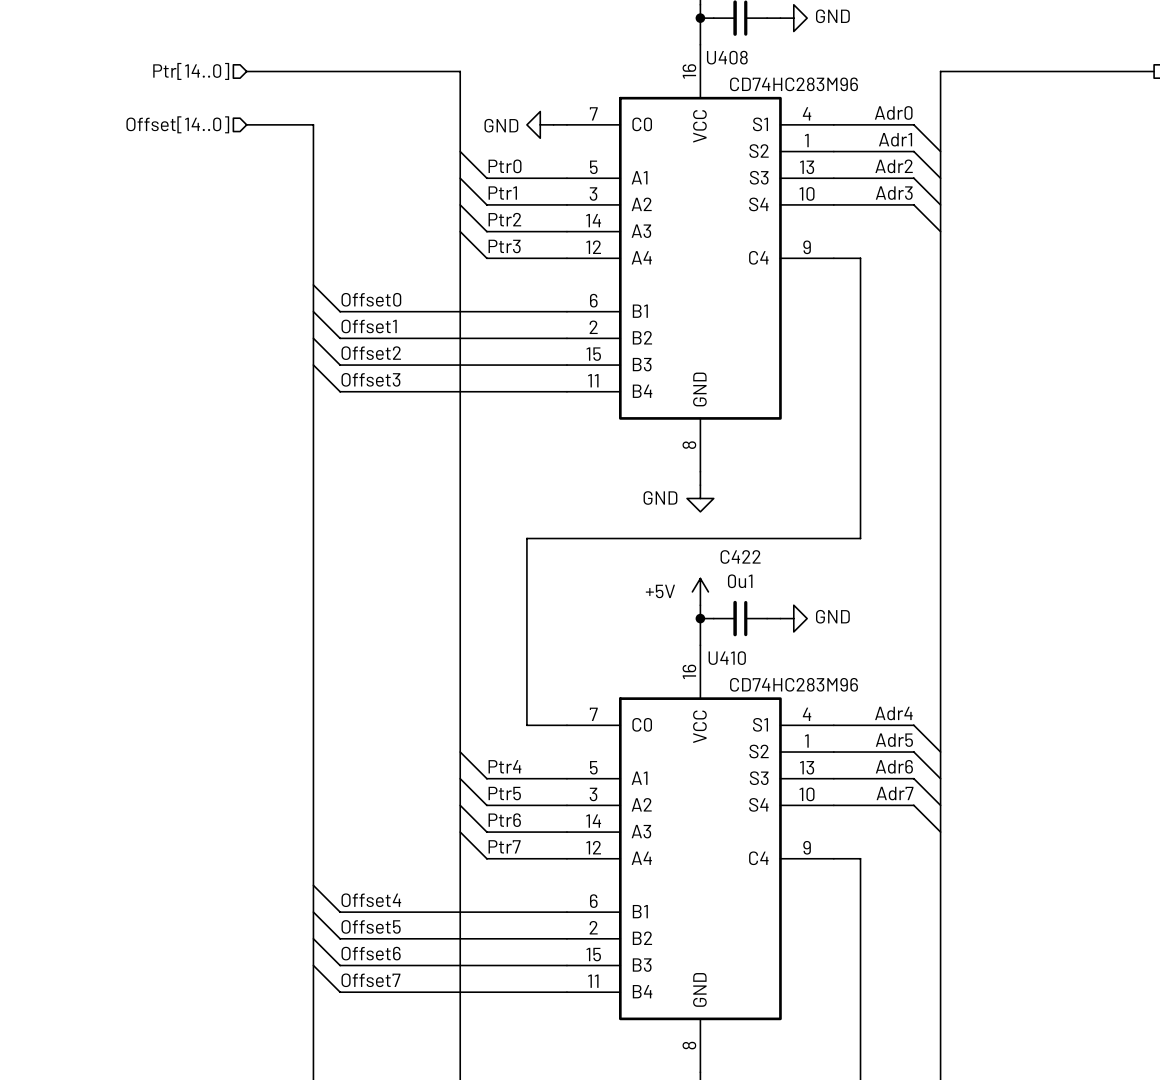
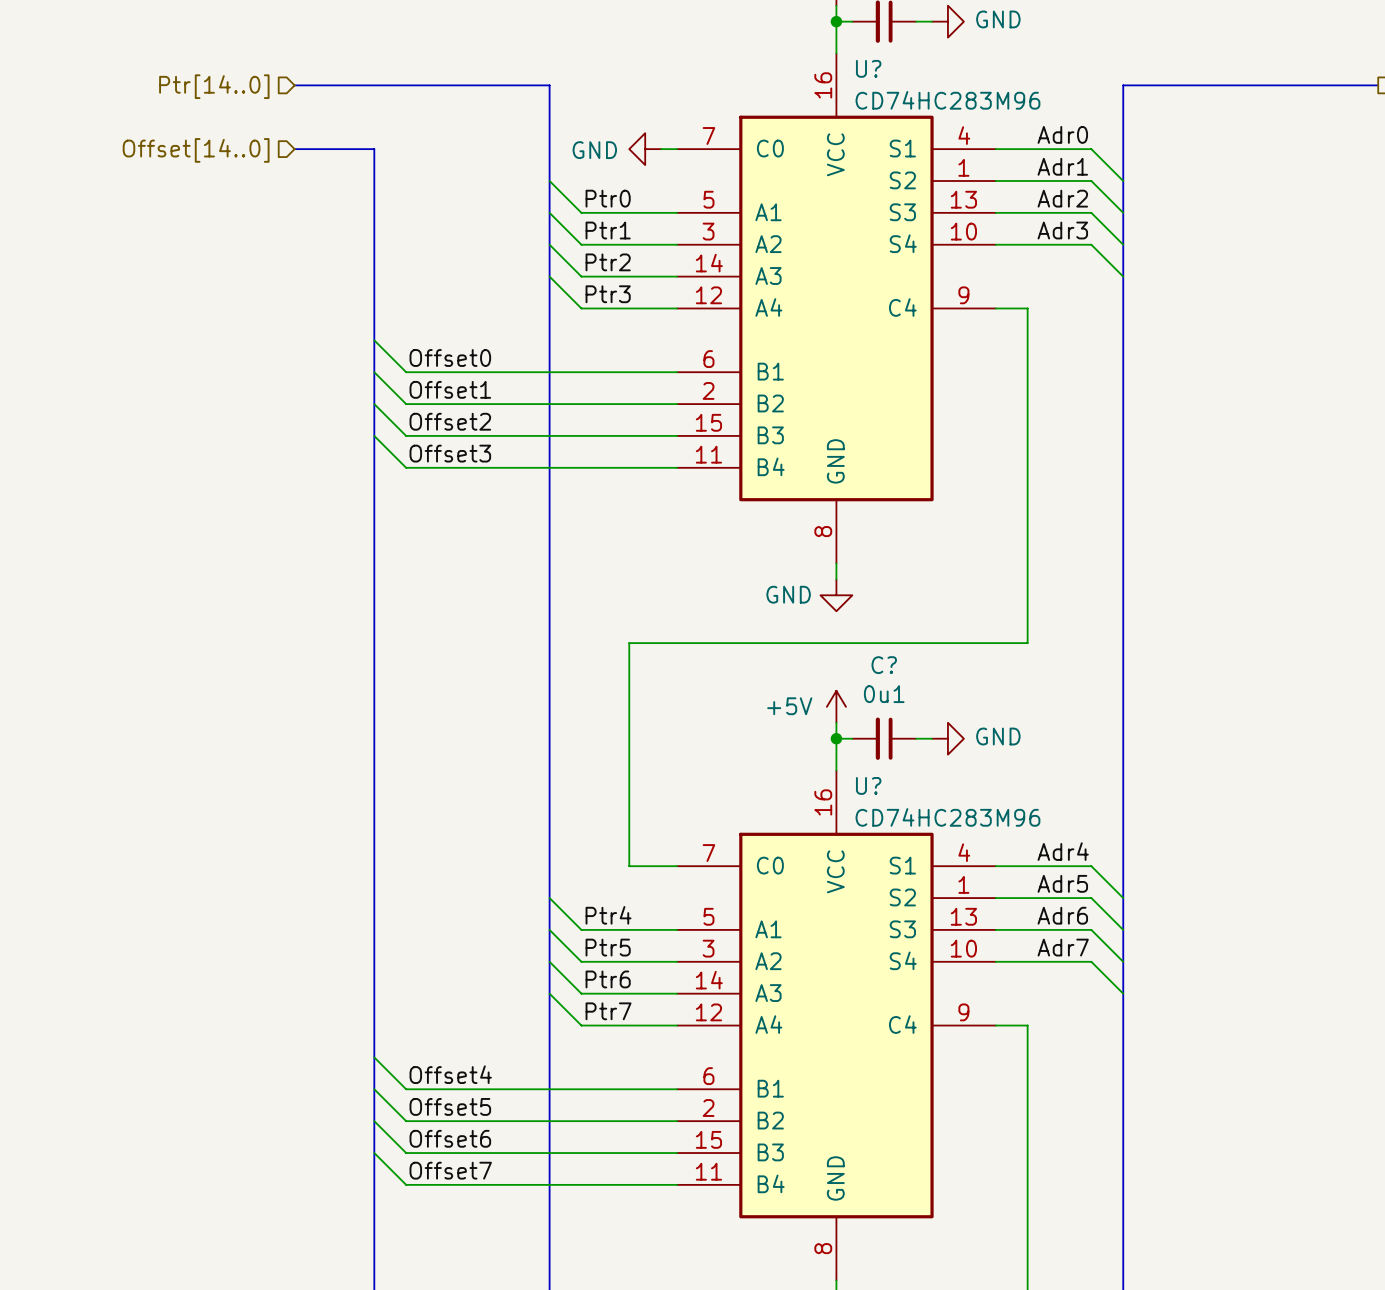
U408 name: U408 (727, 57) -> U? (868, 68)
C422 name: C422 (740, 556) -> C? (884, 665)
U410 name: U410 (727, 658) -> U? (868, 785)

